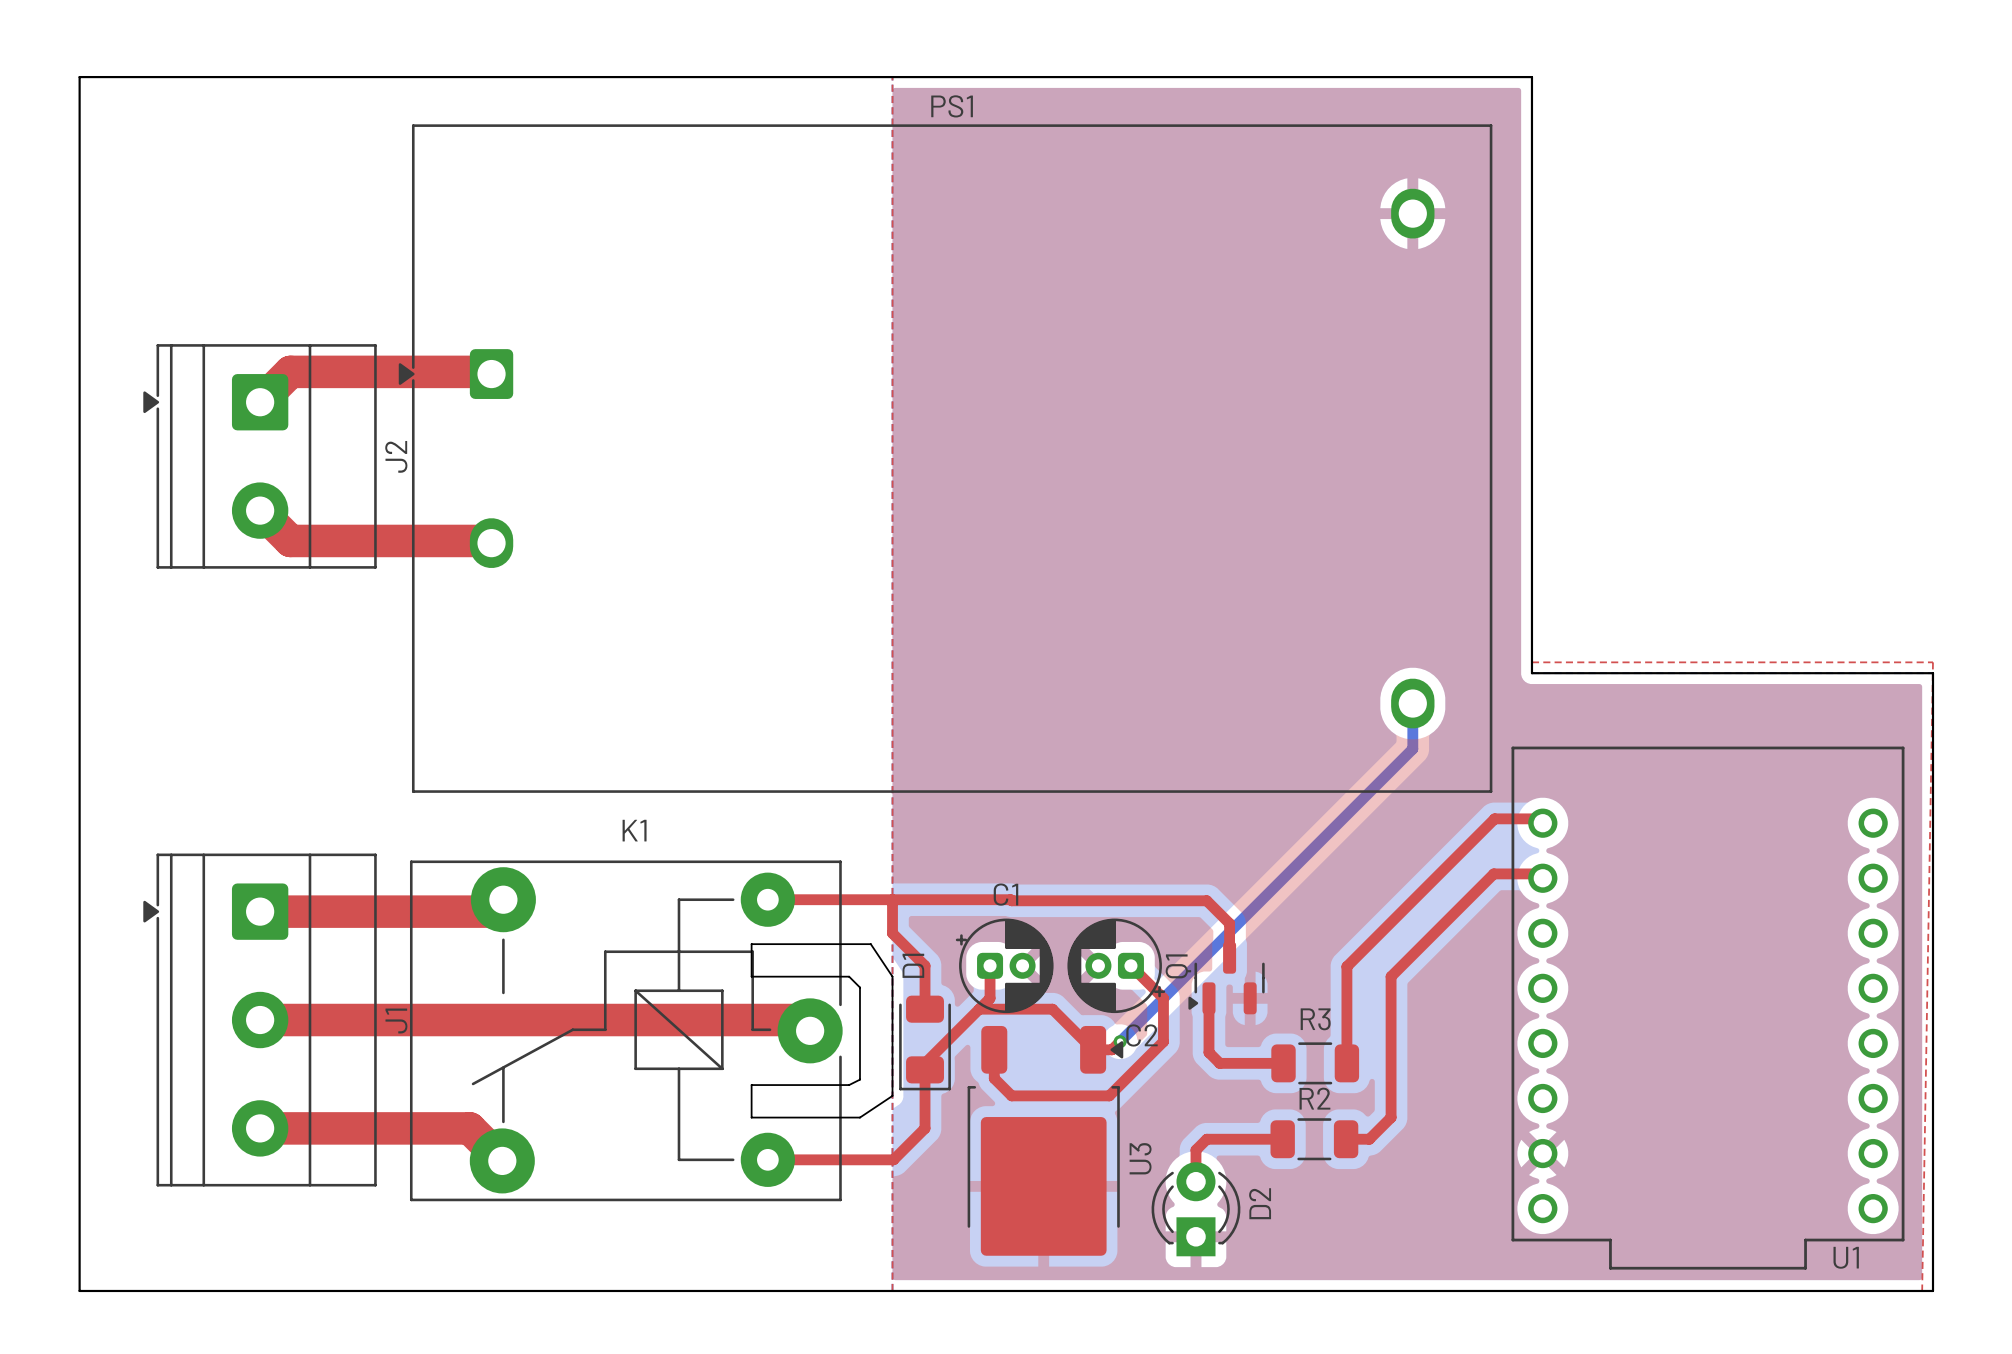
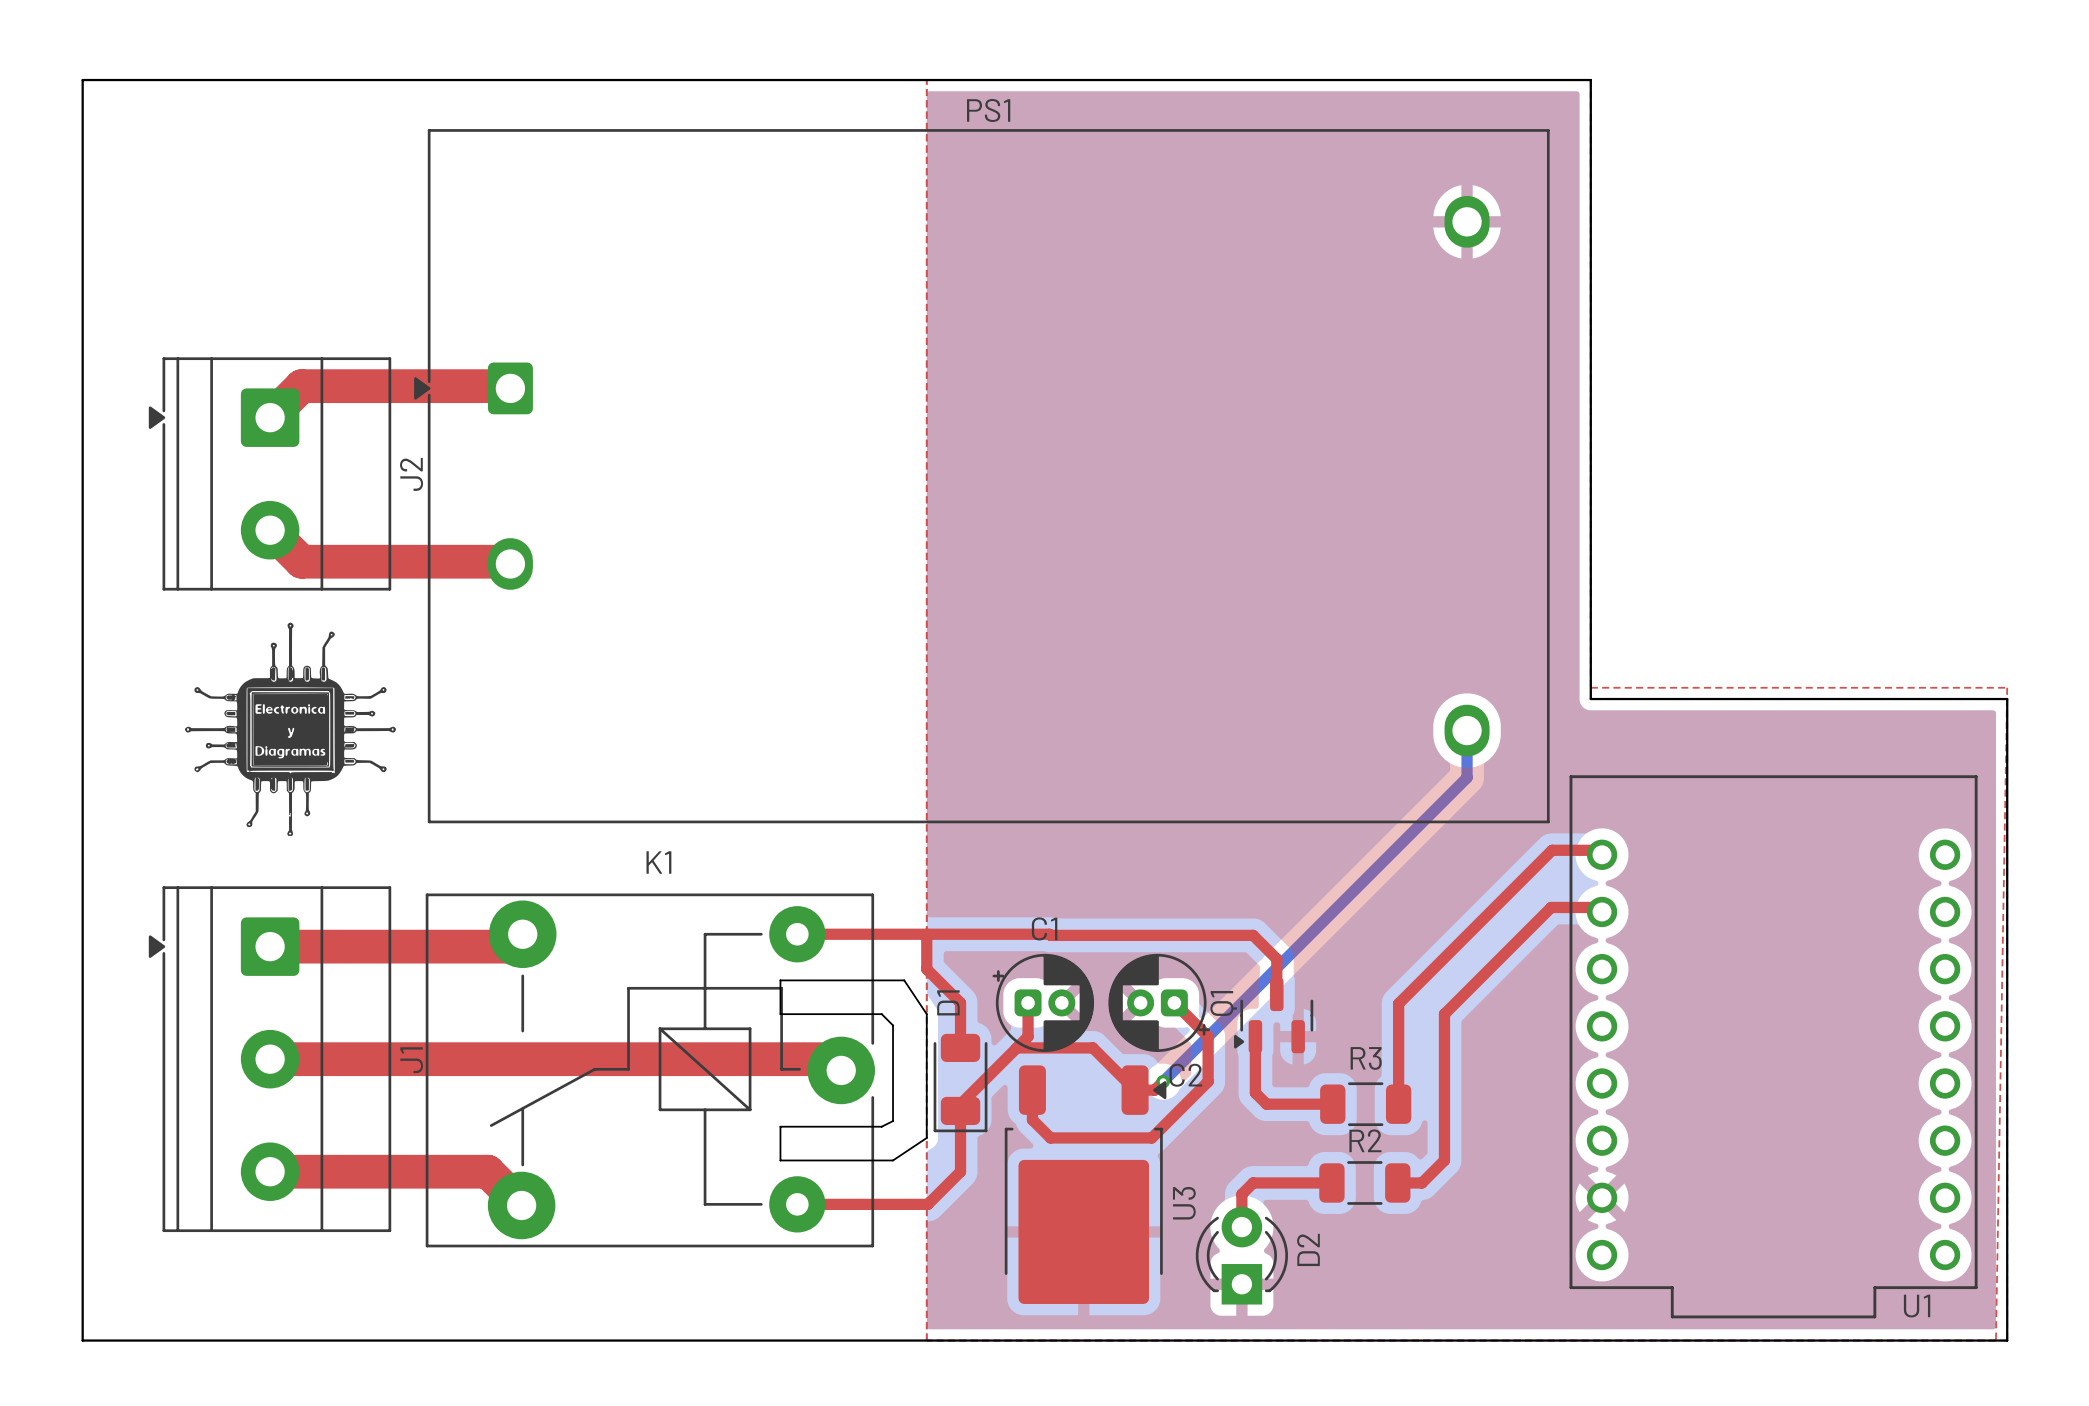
drawing: none -> [184, 622, 396, 836]

